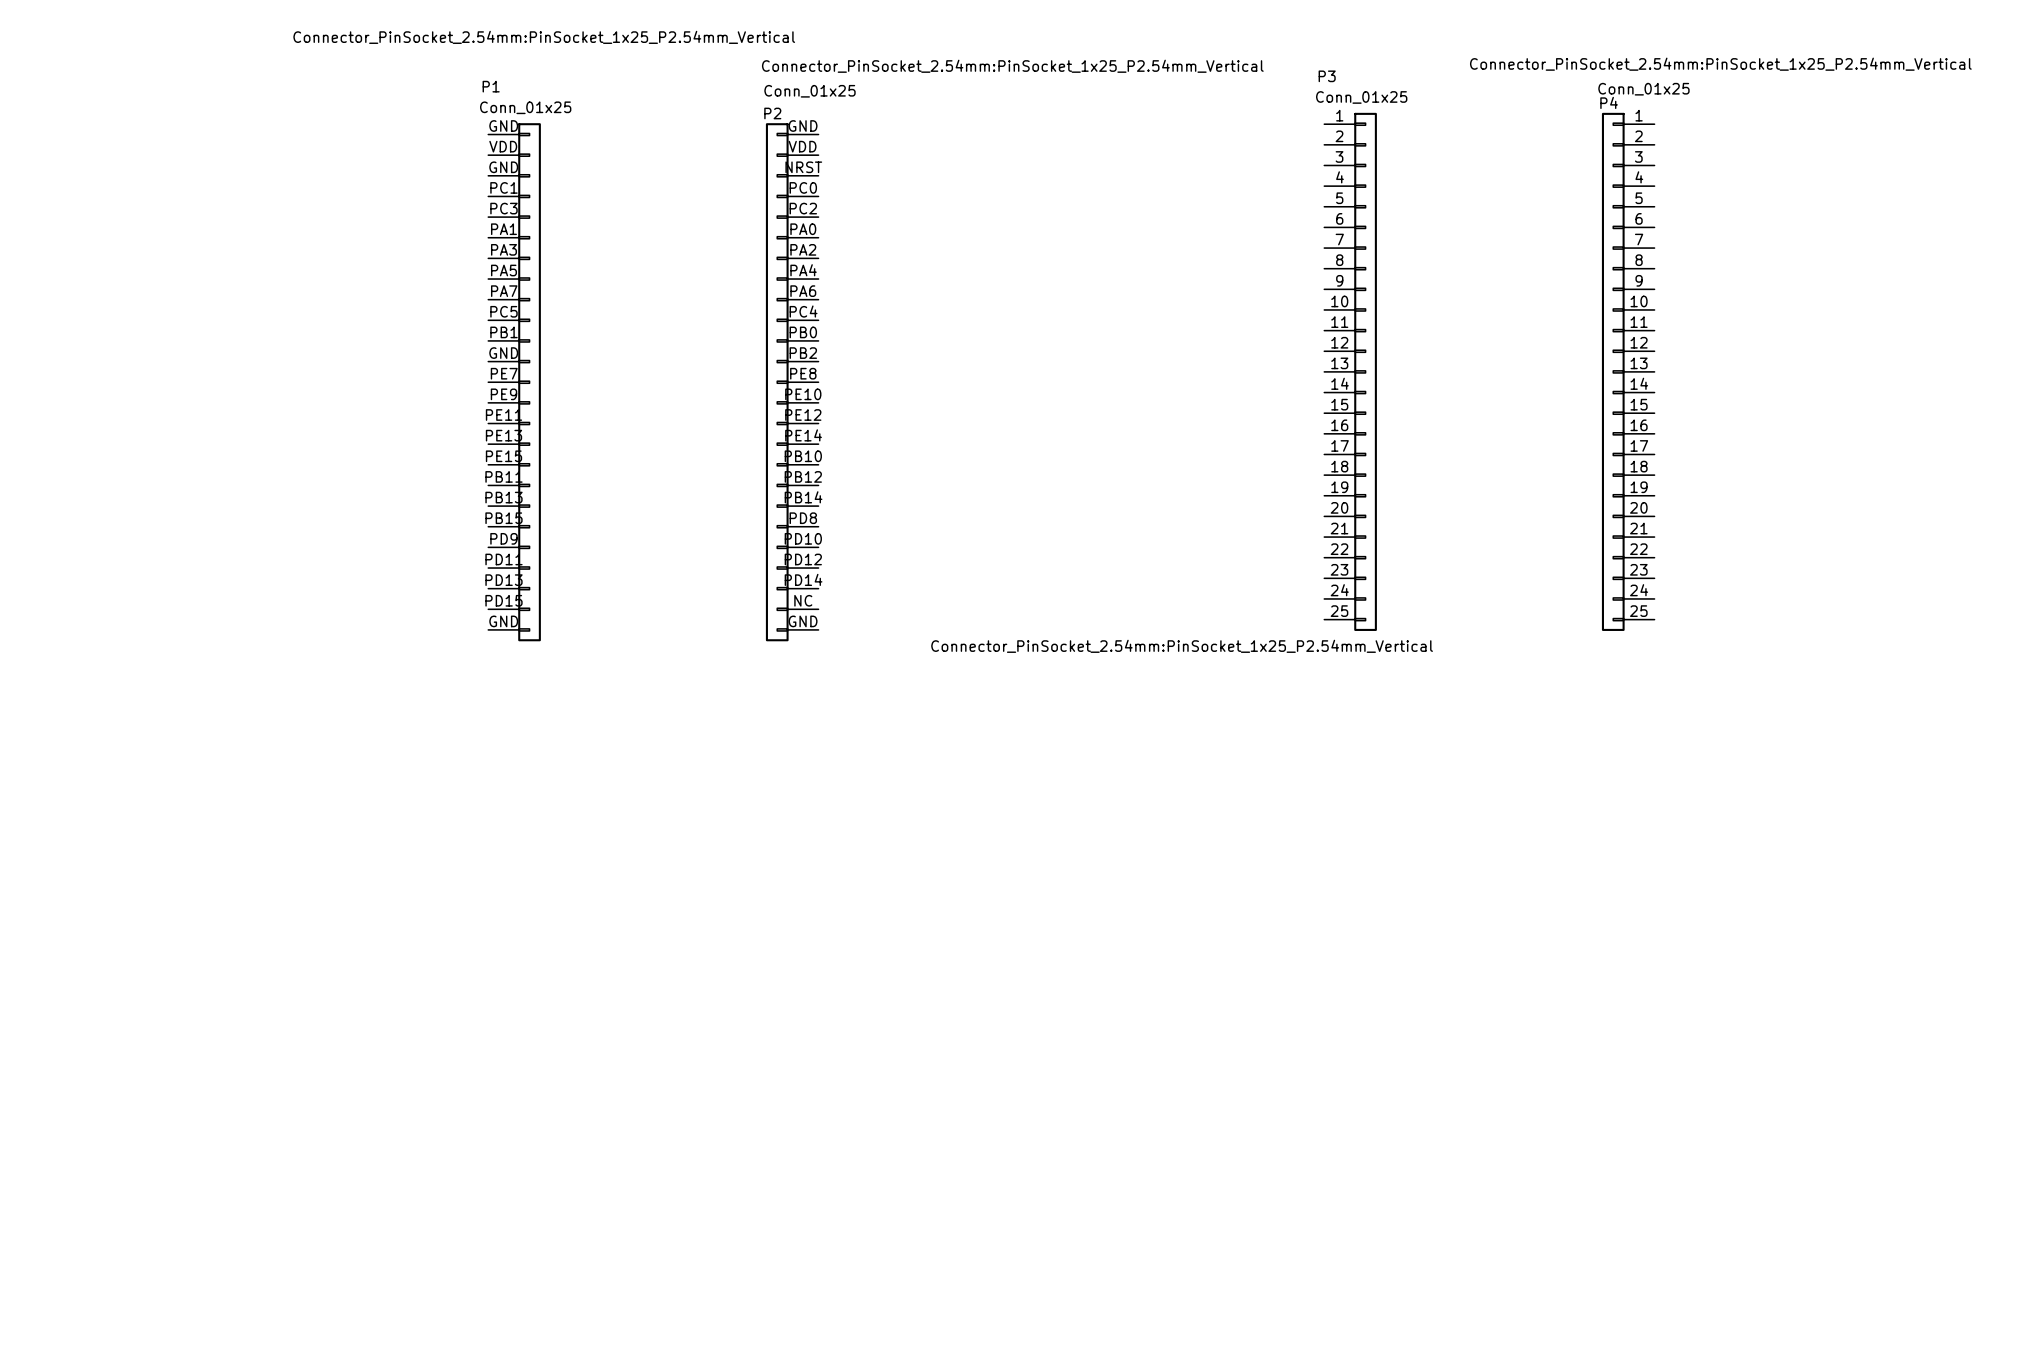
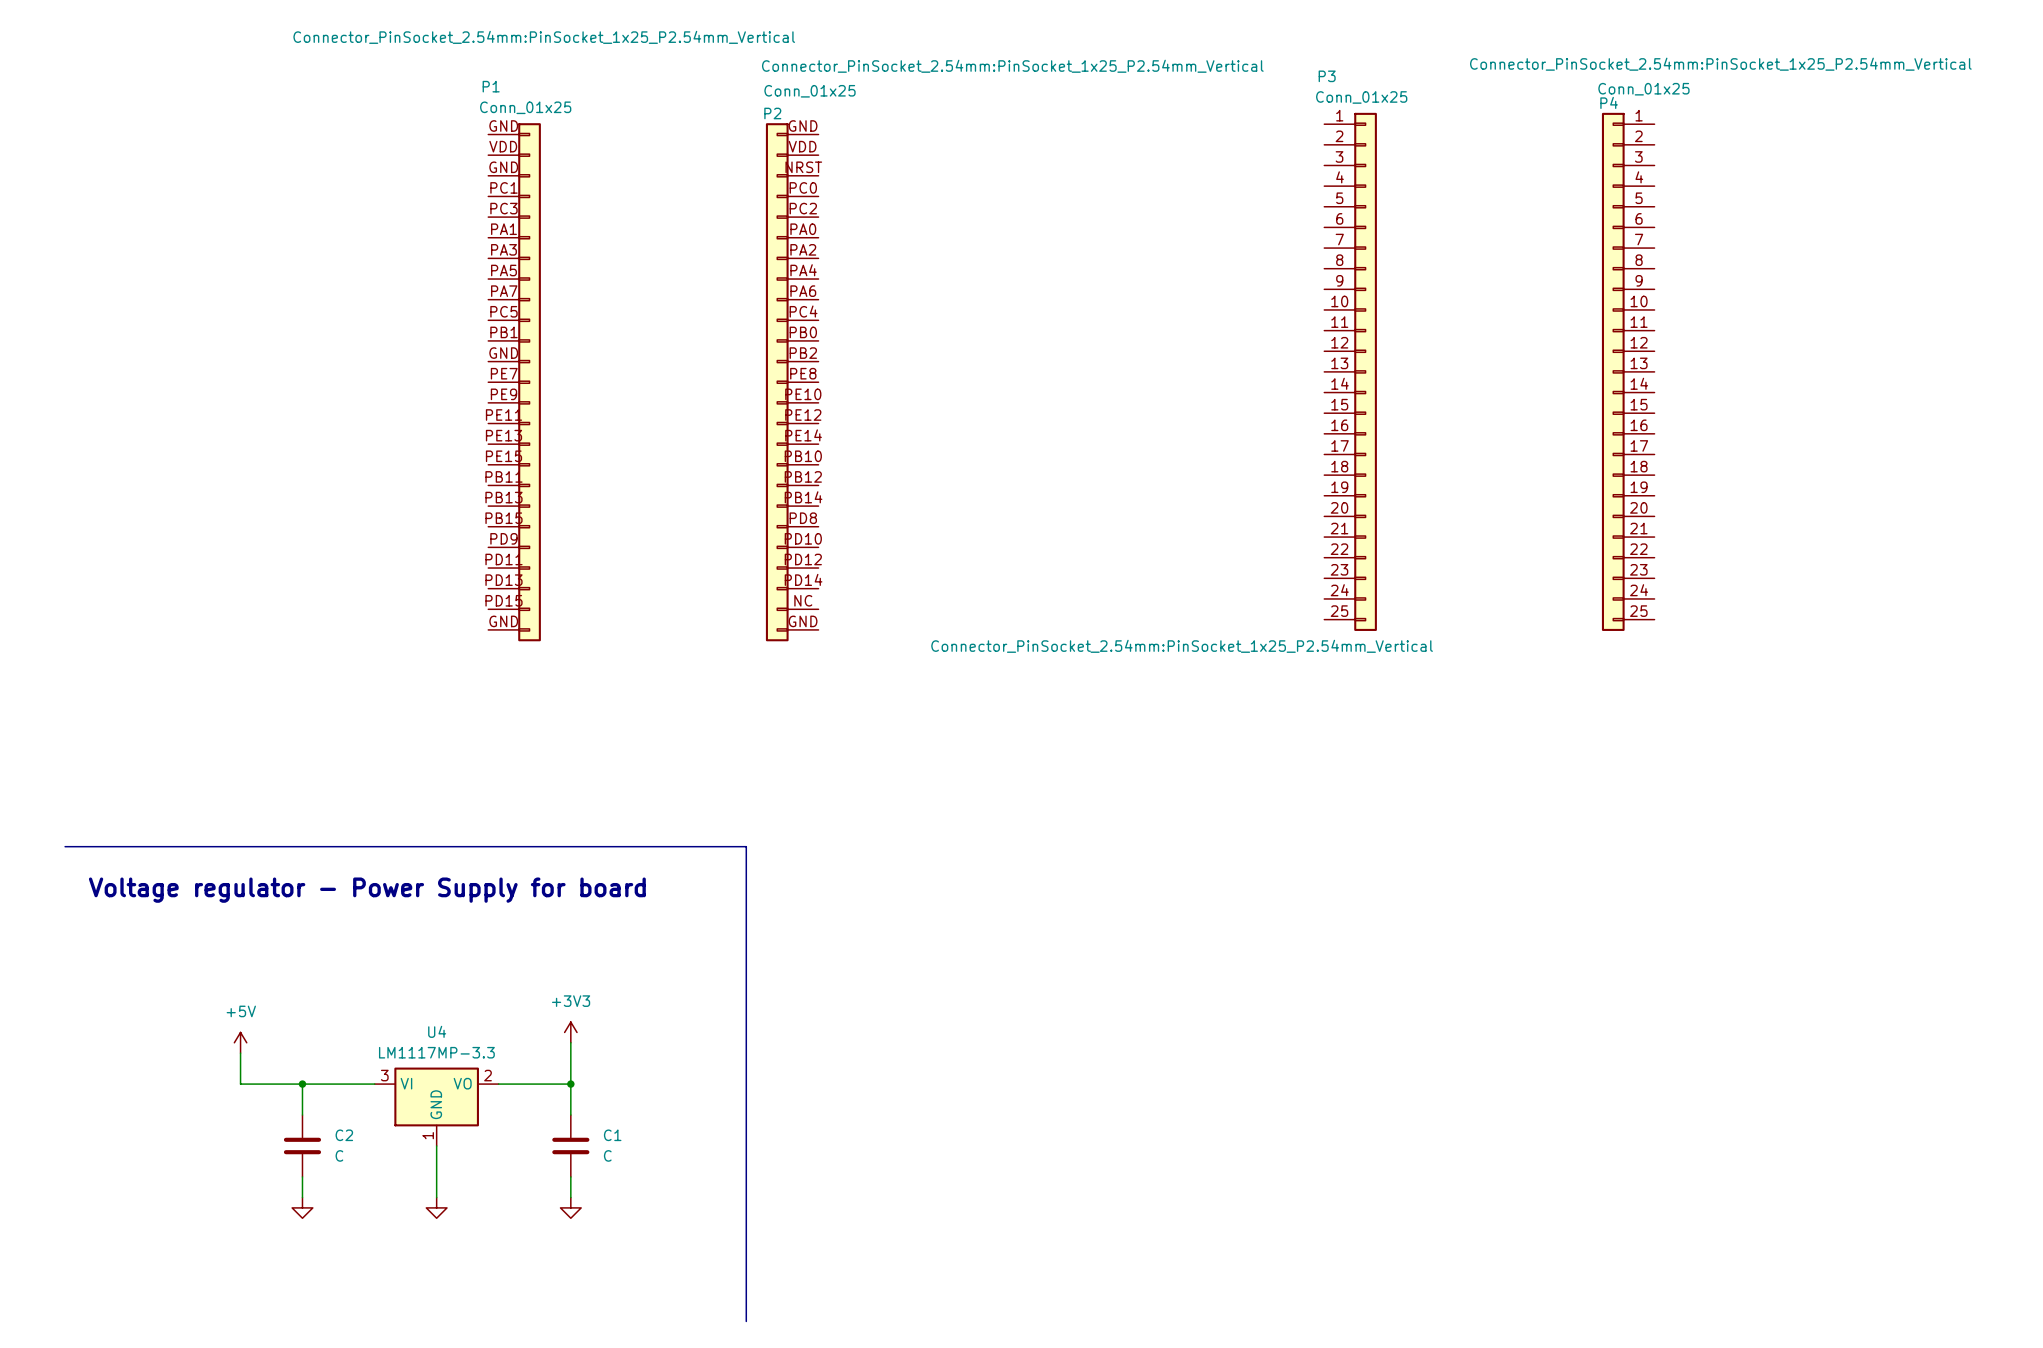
line: none -> (65, 846) (746, 846) (746, 1321)
text: none -> Voltage regulator - Power Supply for board (367, 890)
power symbol: none -> +3V3 (570, 1032)
power symbol: none -> +5V (240, 1042)
wire: none -> (570, 1042) (570, 1115)
wire: none -> (240, 1053) (240, 1084) (374, 1084)
wire: none -> (302, 1084) (302, 1115)
junction: none -> (302, 1084)
wire: none -> (498, 1084) (570, 1084)
junction: none -> (570, 1084)
U4: none -> LM1117MP-3.3 (436, 1106)
C2: none -> C (302, 1146)
wire: none -> (436, 1146) (436, 1197)
C1: none -> C (570, 1146)
wire: none -> (302, 1176) (302, 1197)
wire: none -> (570, 1176) (570, 1197)
power symbol: none -> (302, 1207)
power symbol: none -> (436, 1207)
power symbol: none -> (570, 1207)

